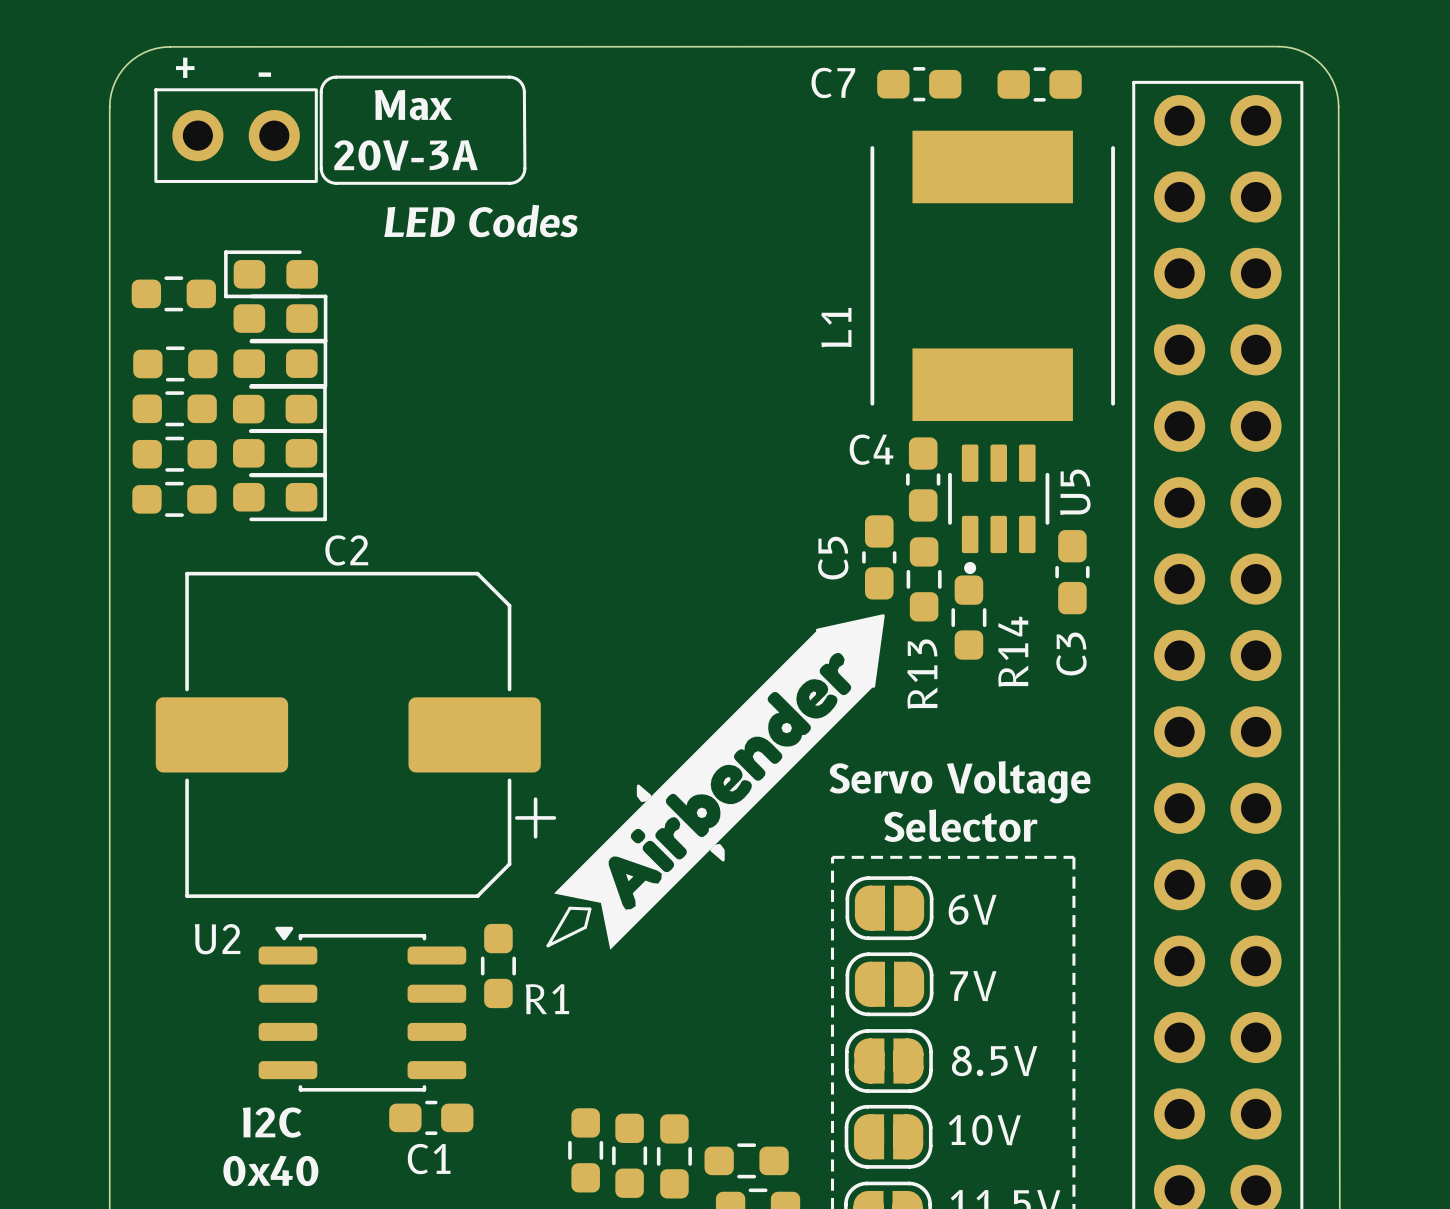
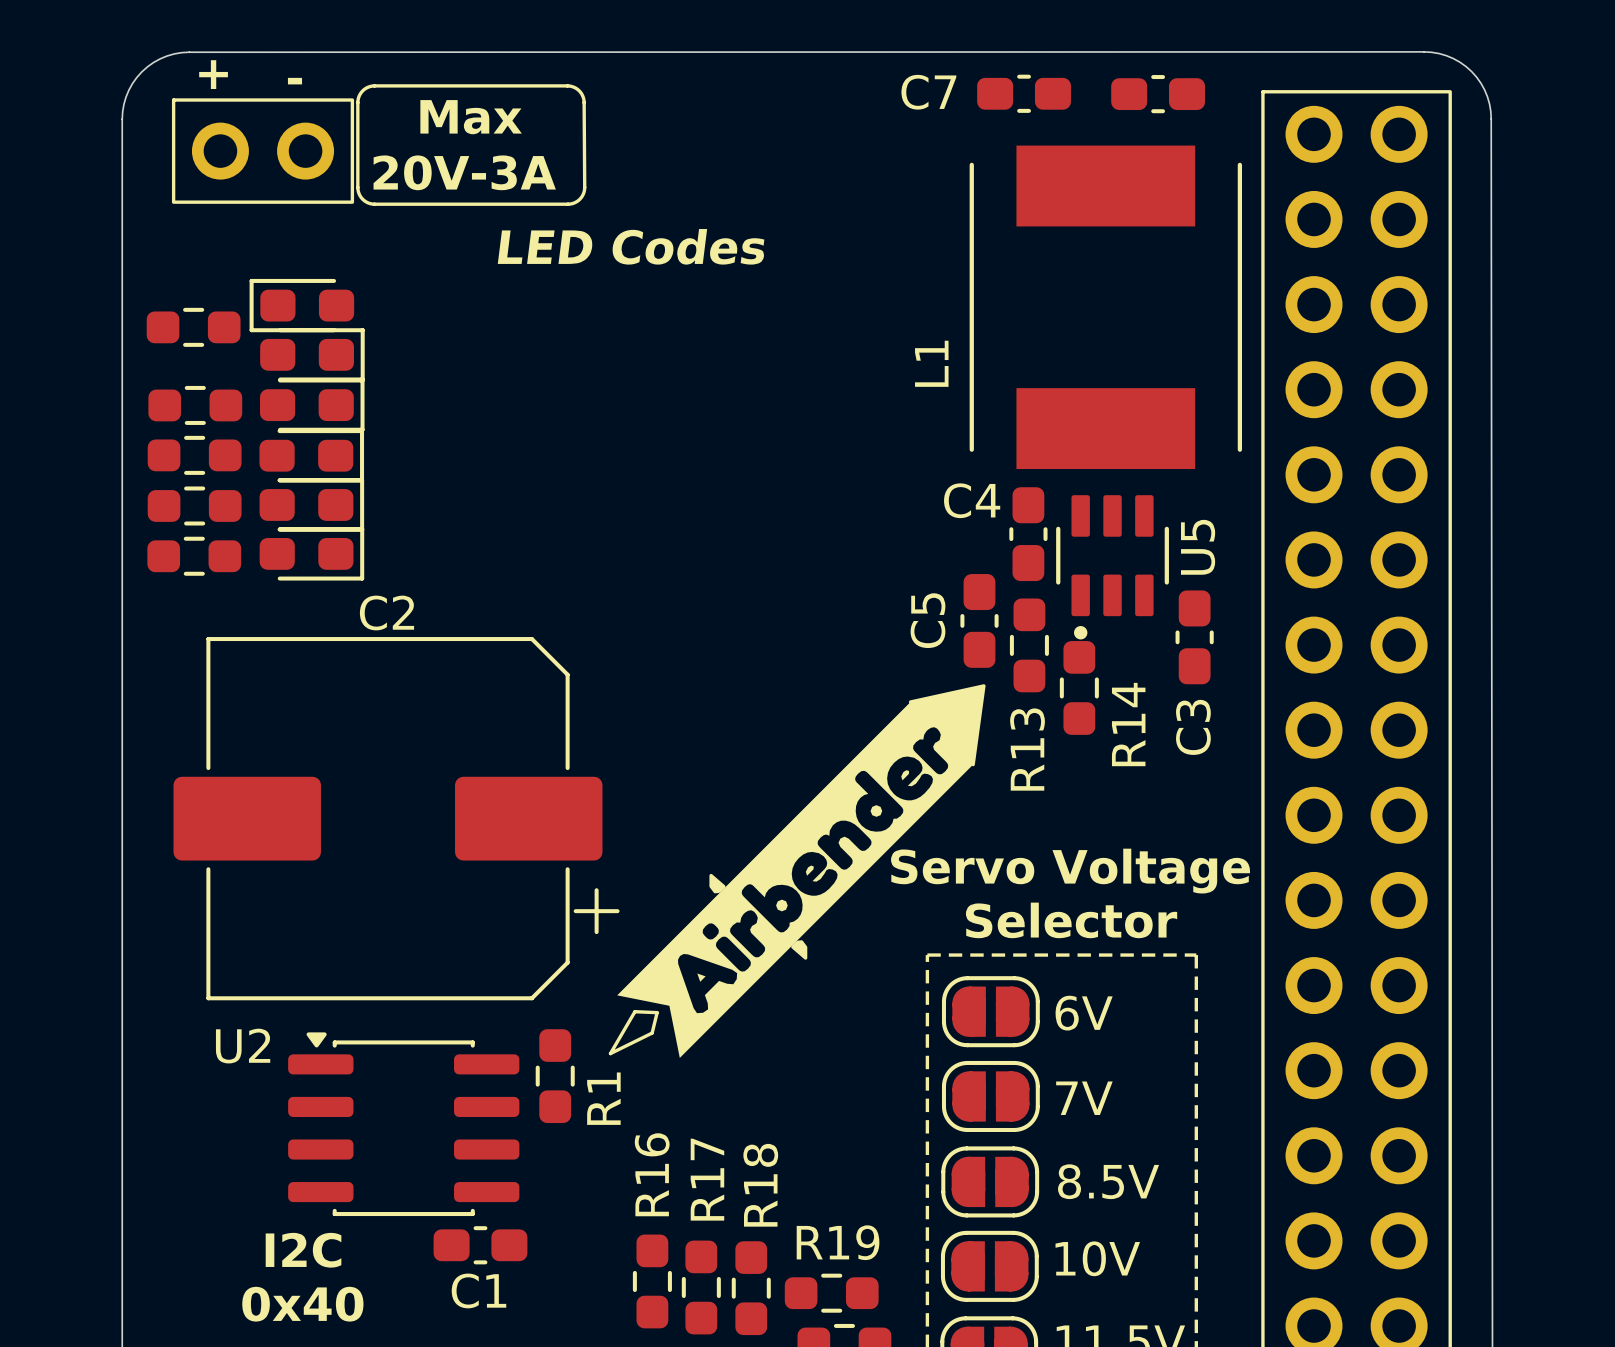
text position: LED Codes (480, 221) -> LED Codes (631, 246)
R1 name rotation: 0° (547, 999) -> 90° counterclockwise (603, 1098)
R16 name: none -> R16 (652, 1174)
R17 name: none -> R17 (707, 1179)
R18 name: none -> R18 (760, 1185)
R19 name: none -> R19 (838, 1242)

